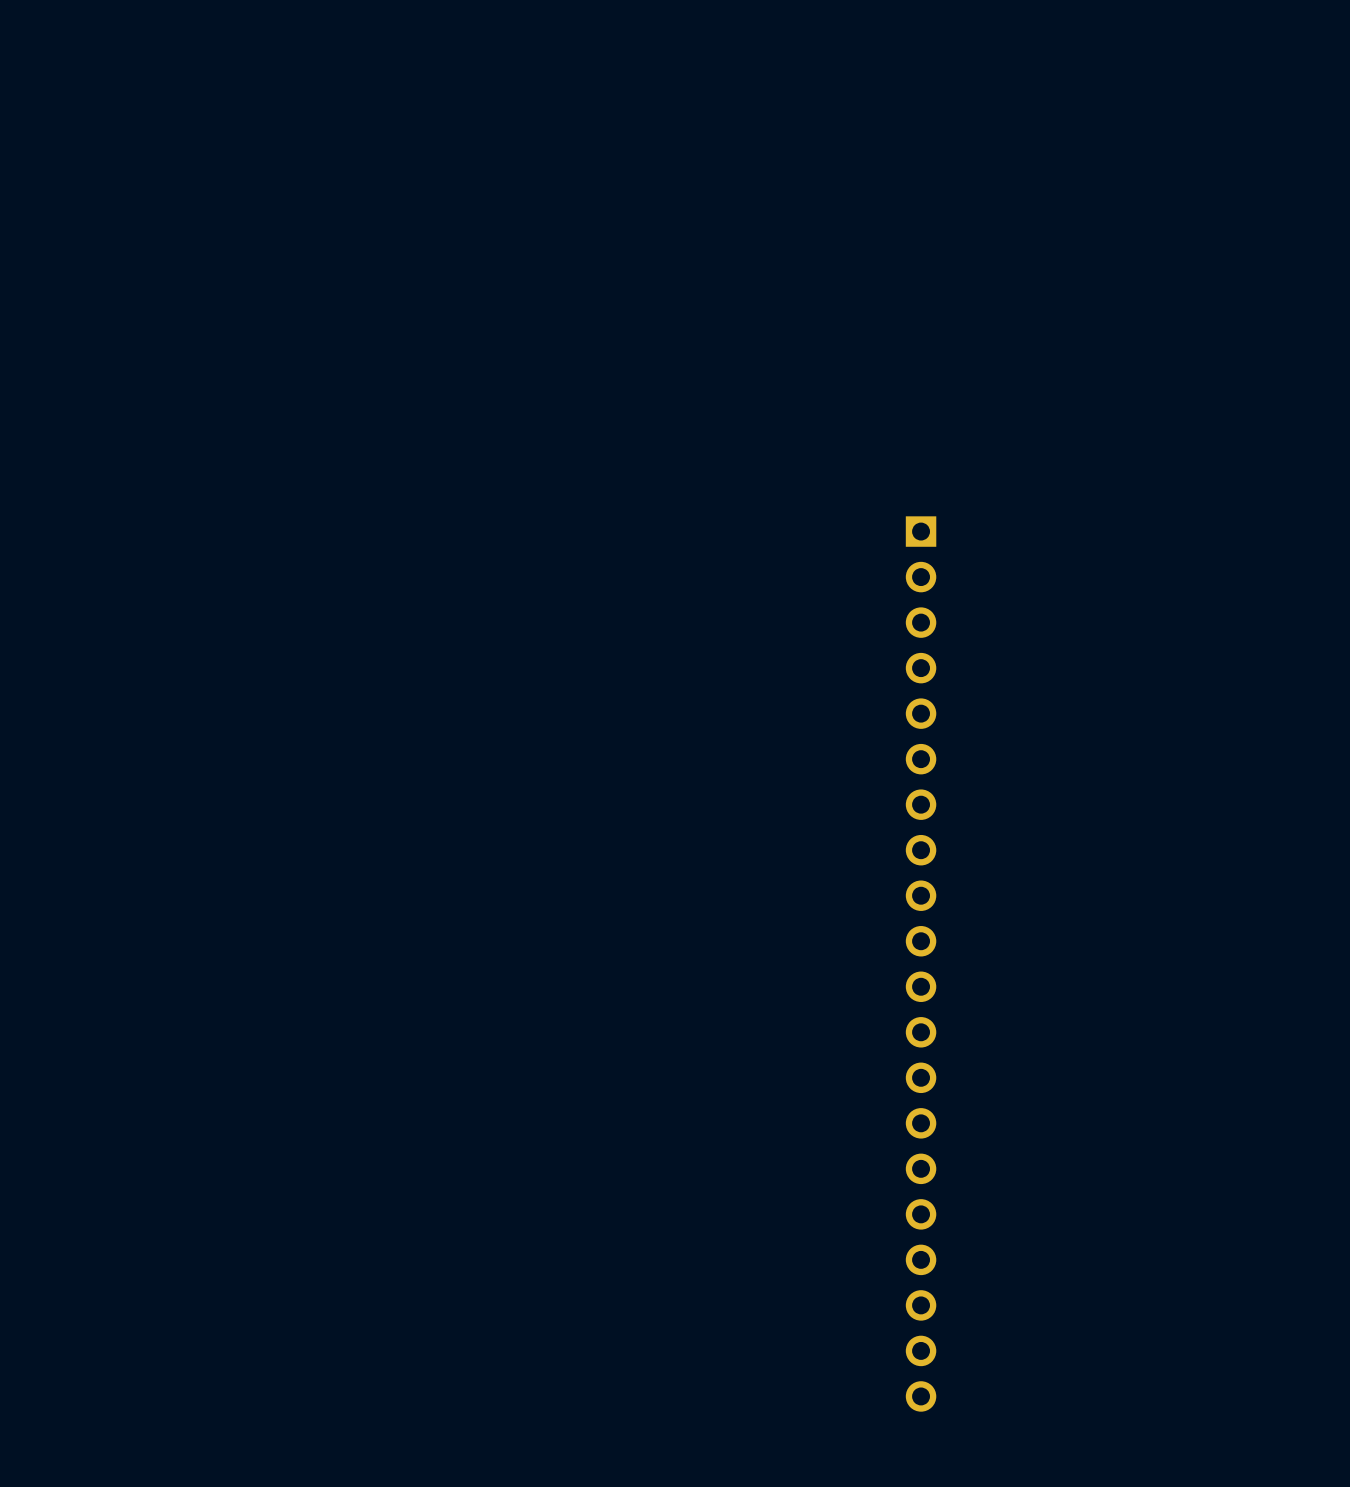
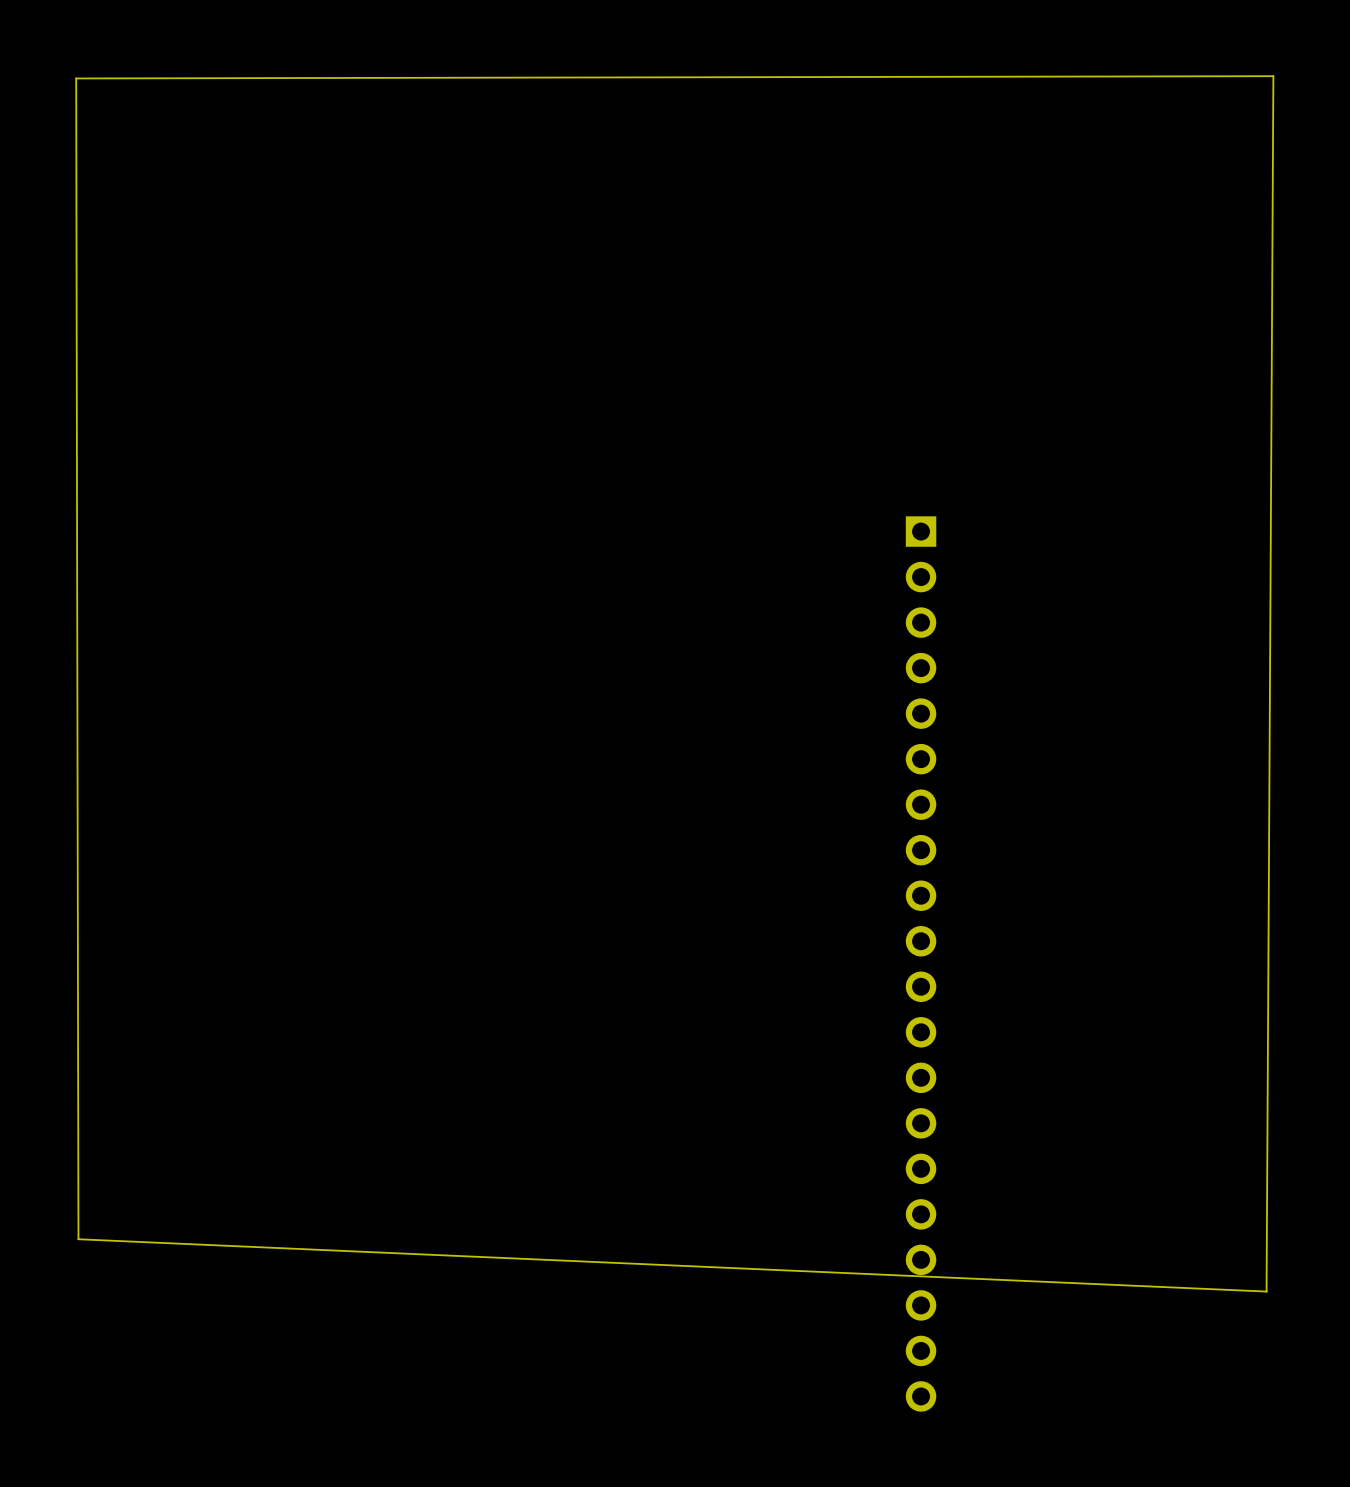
board edge: none -> (1273, 76) (1266, 1291) (78, 1239) (76, 78) (1273, 76)

